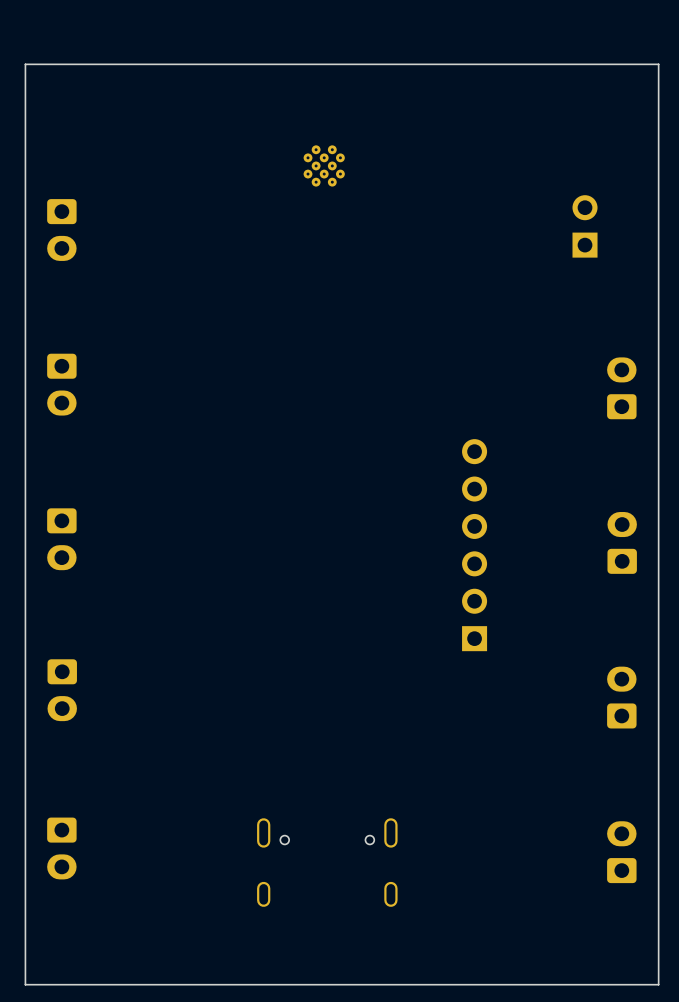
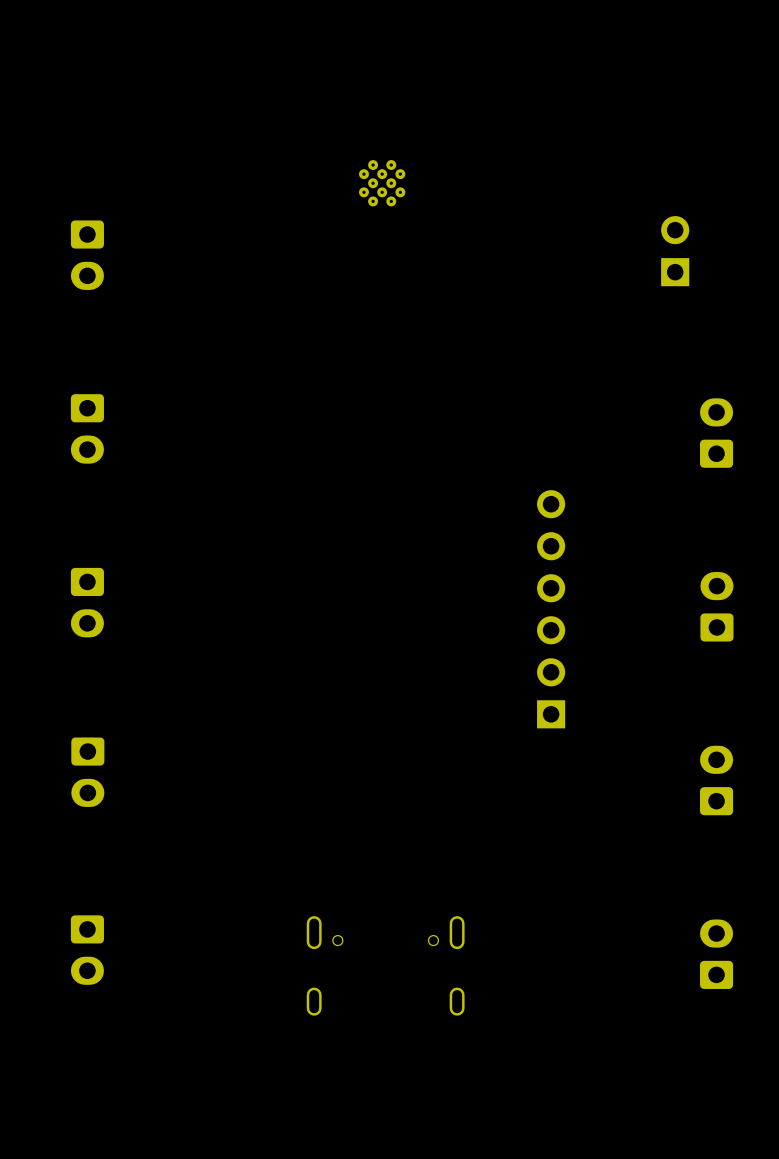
board edge: (658, 64) (25, 64) (25, 984) (658, 984) (658, 64) -> none

